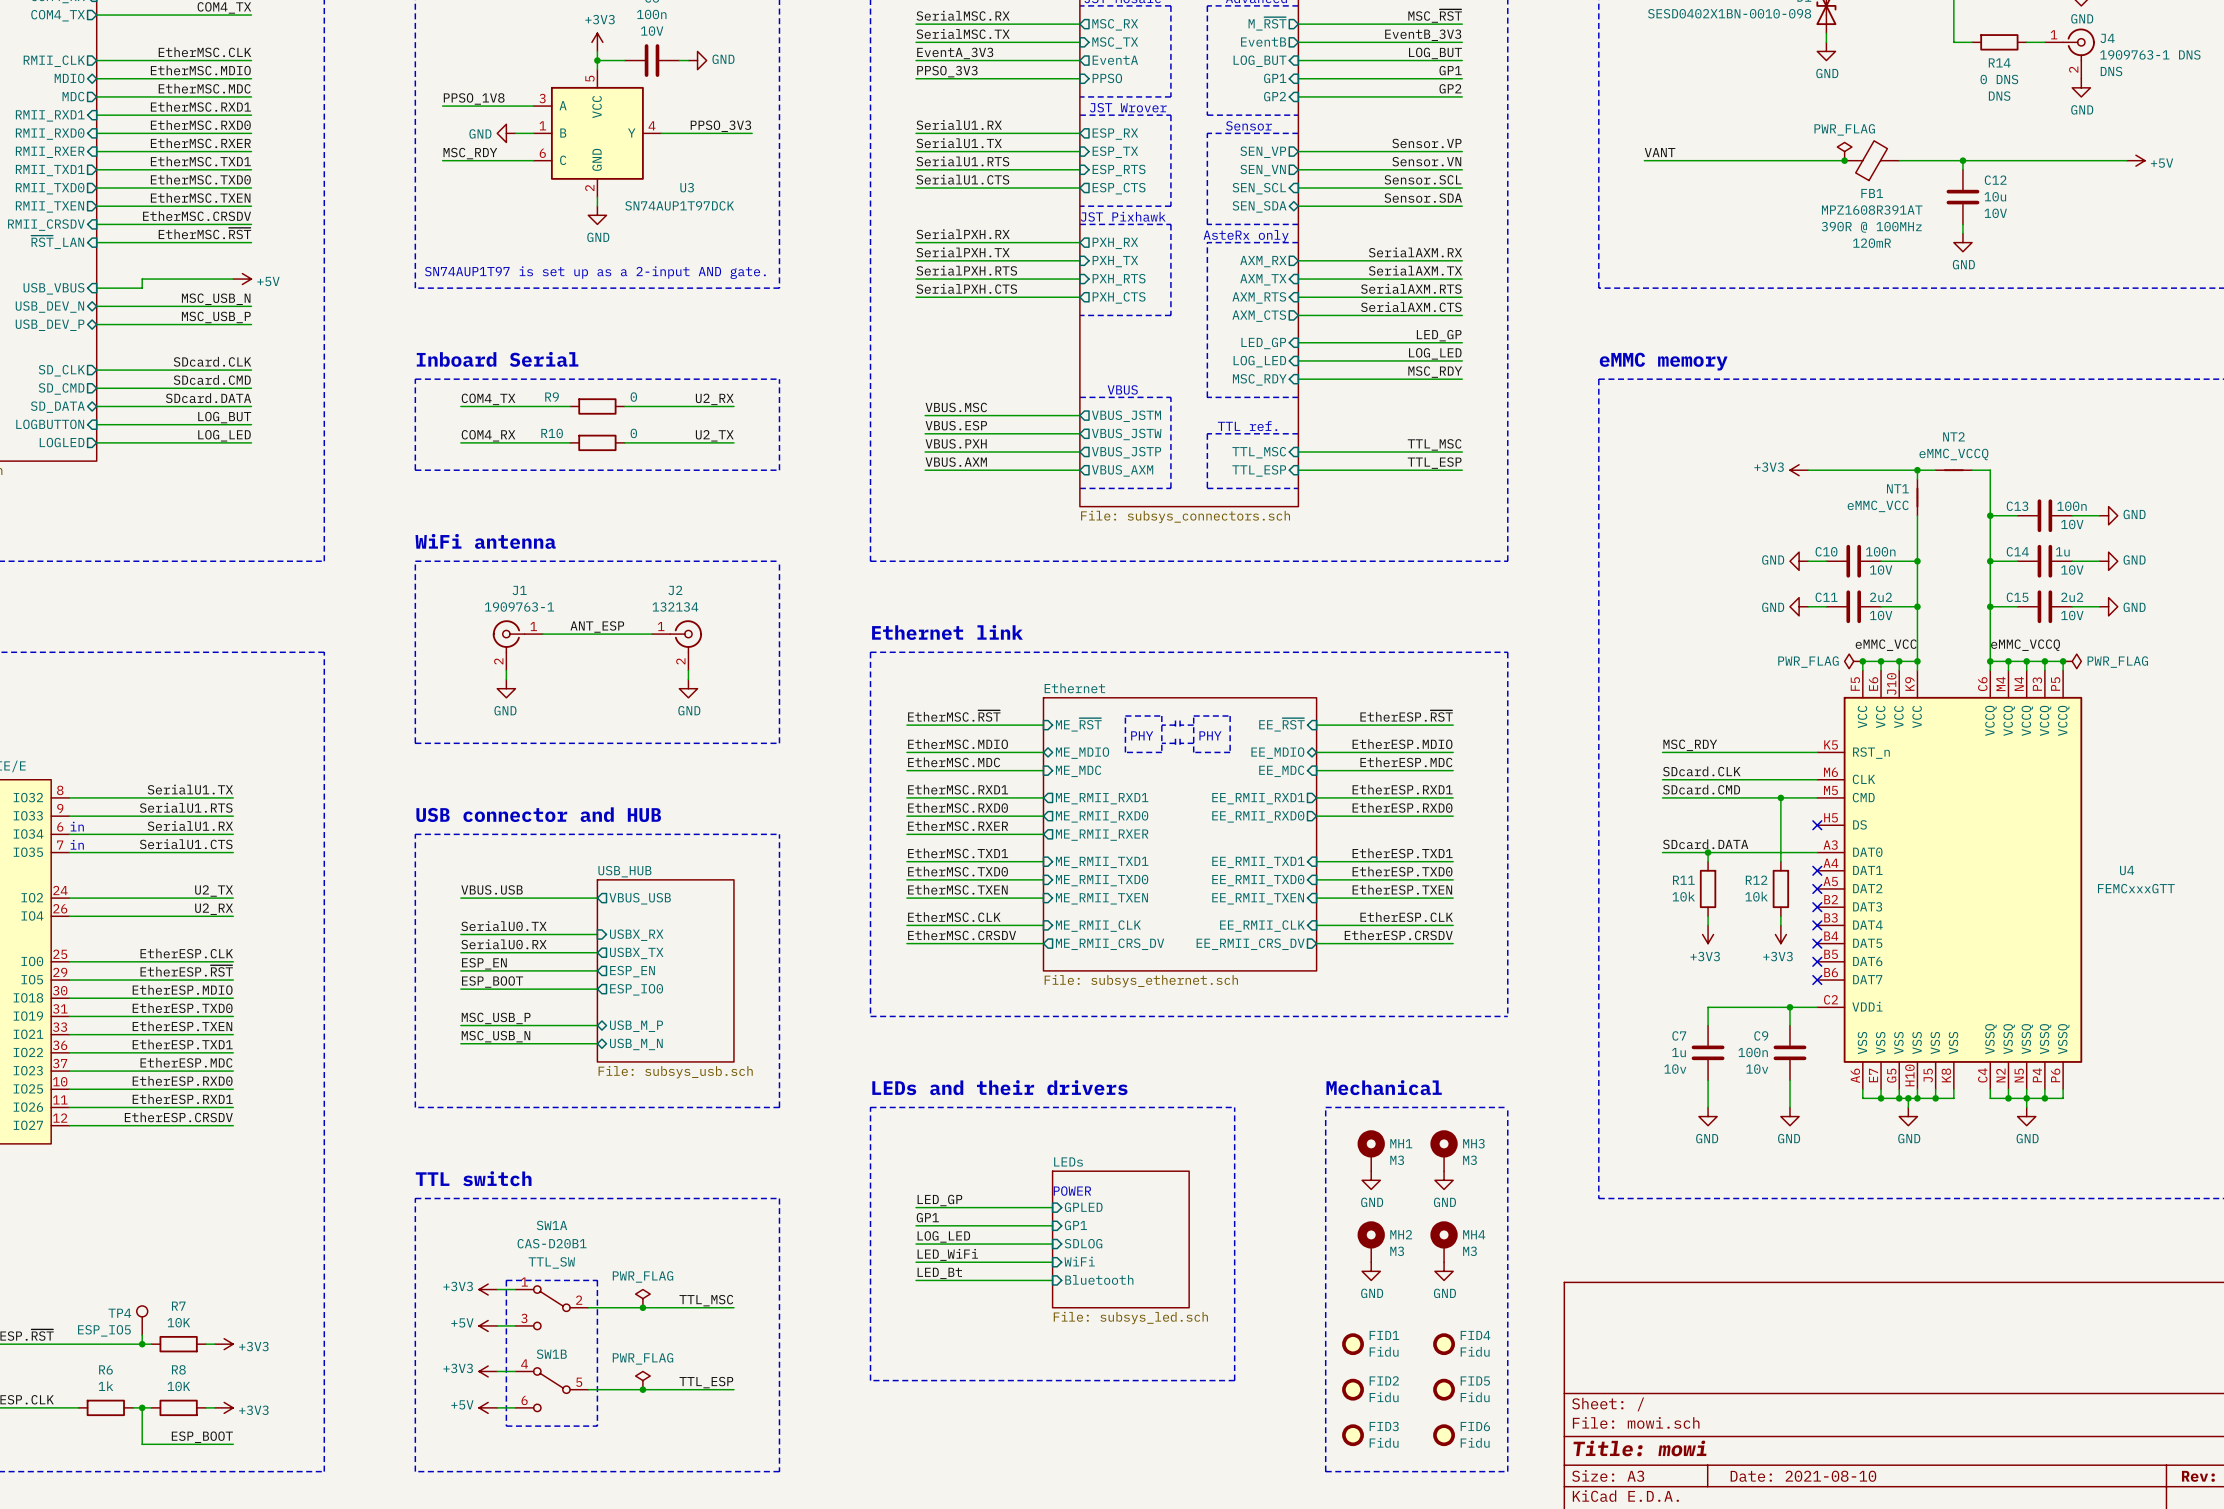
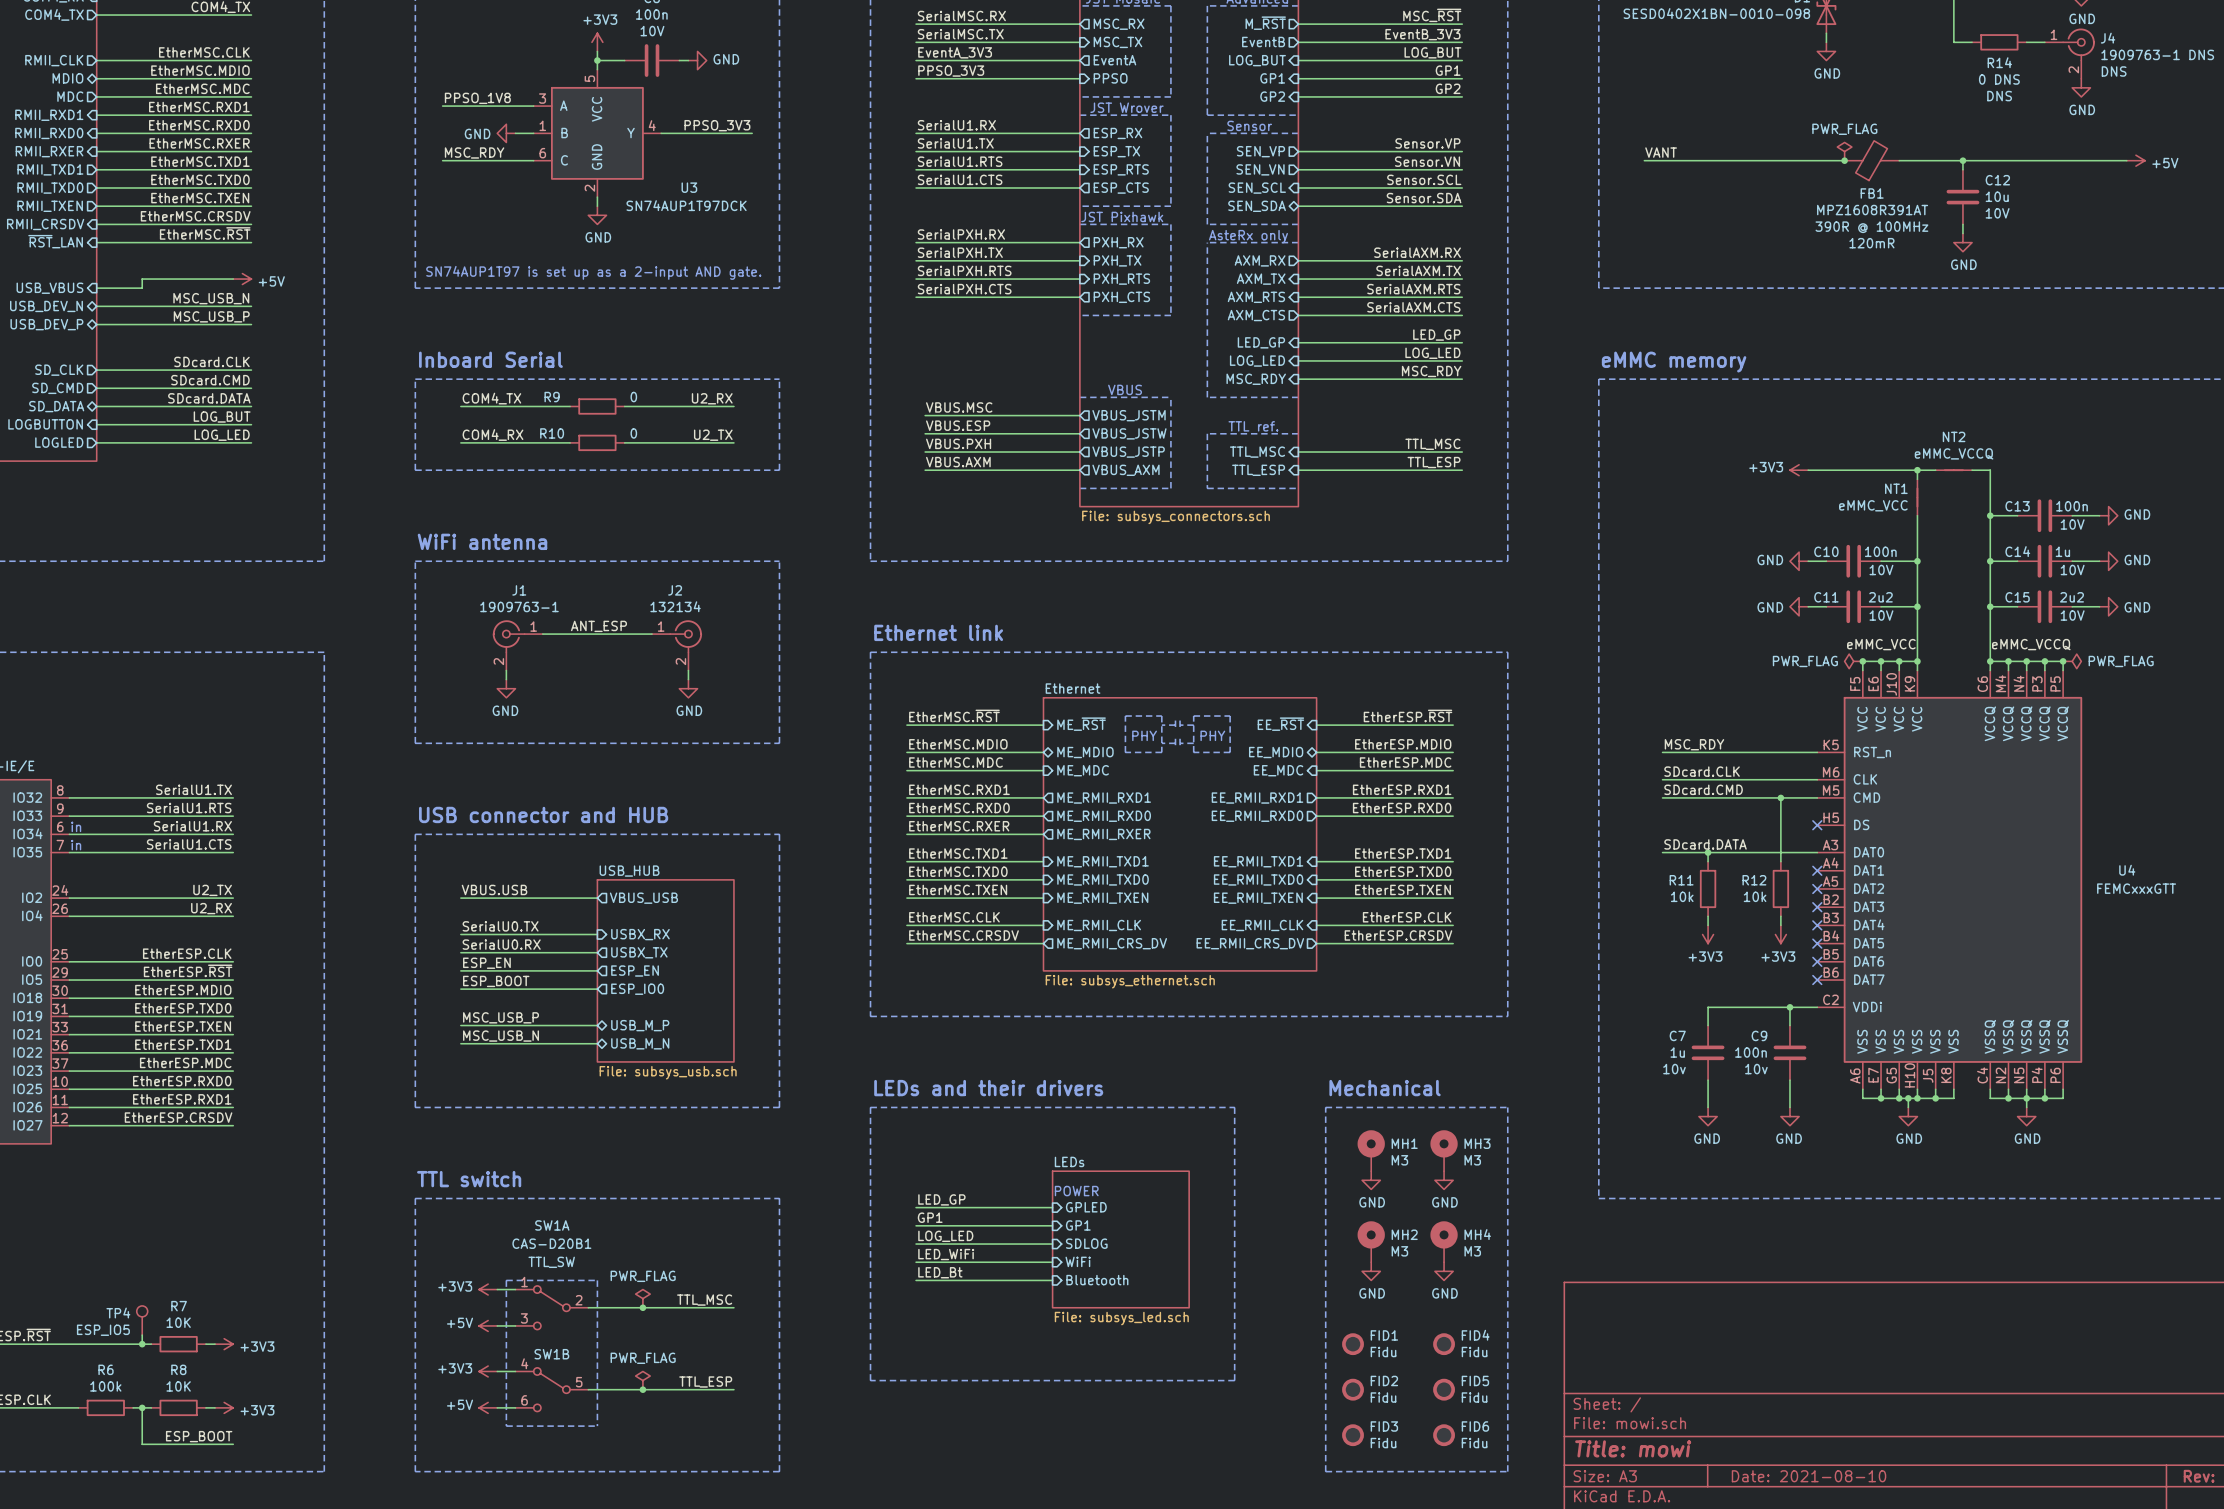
R6 value: 1k (105, 1386) -> 100k (105, 1386)

